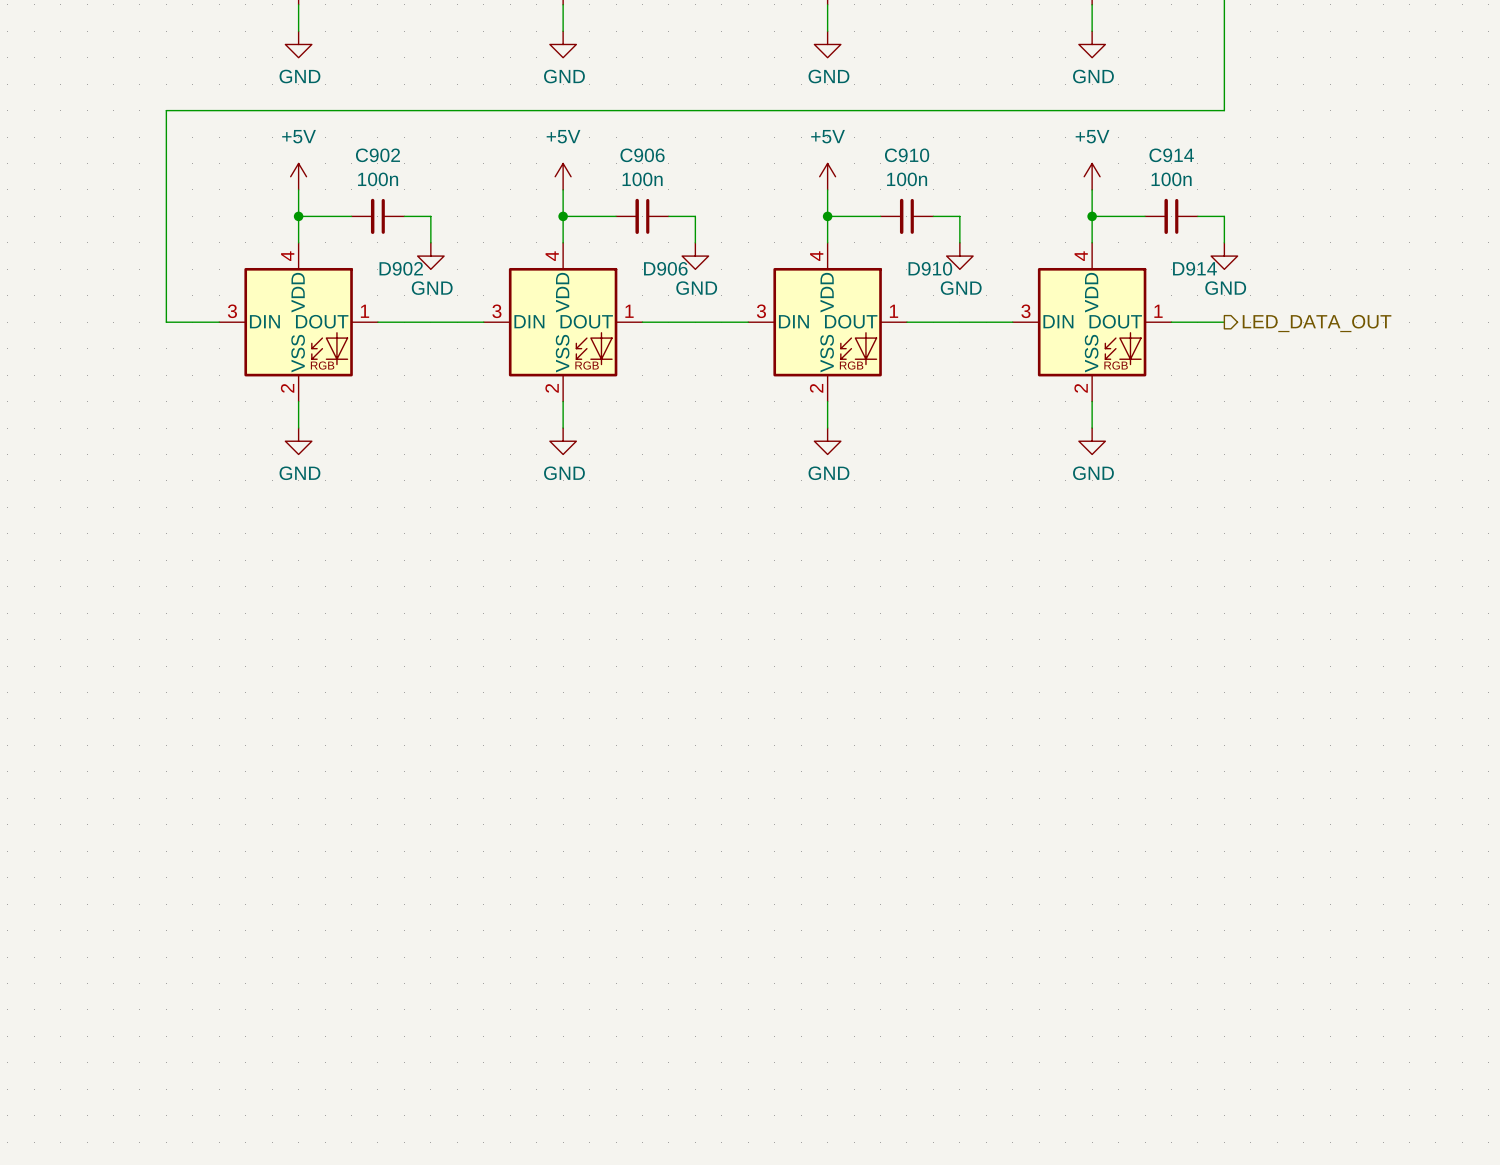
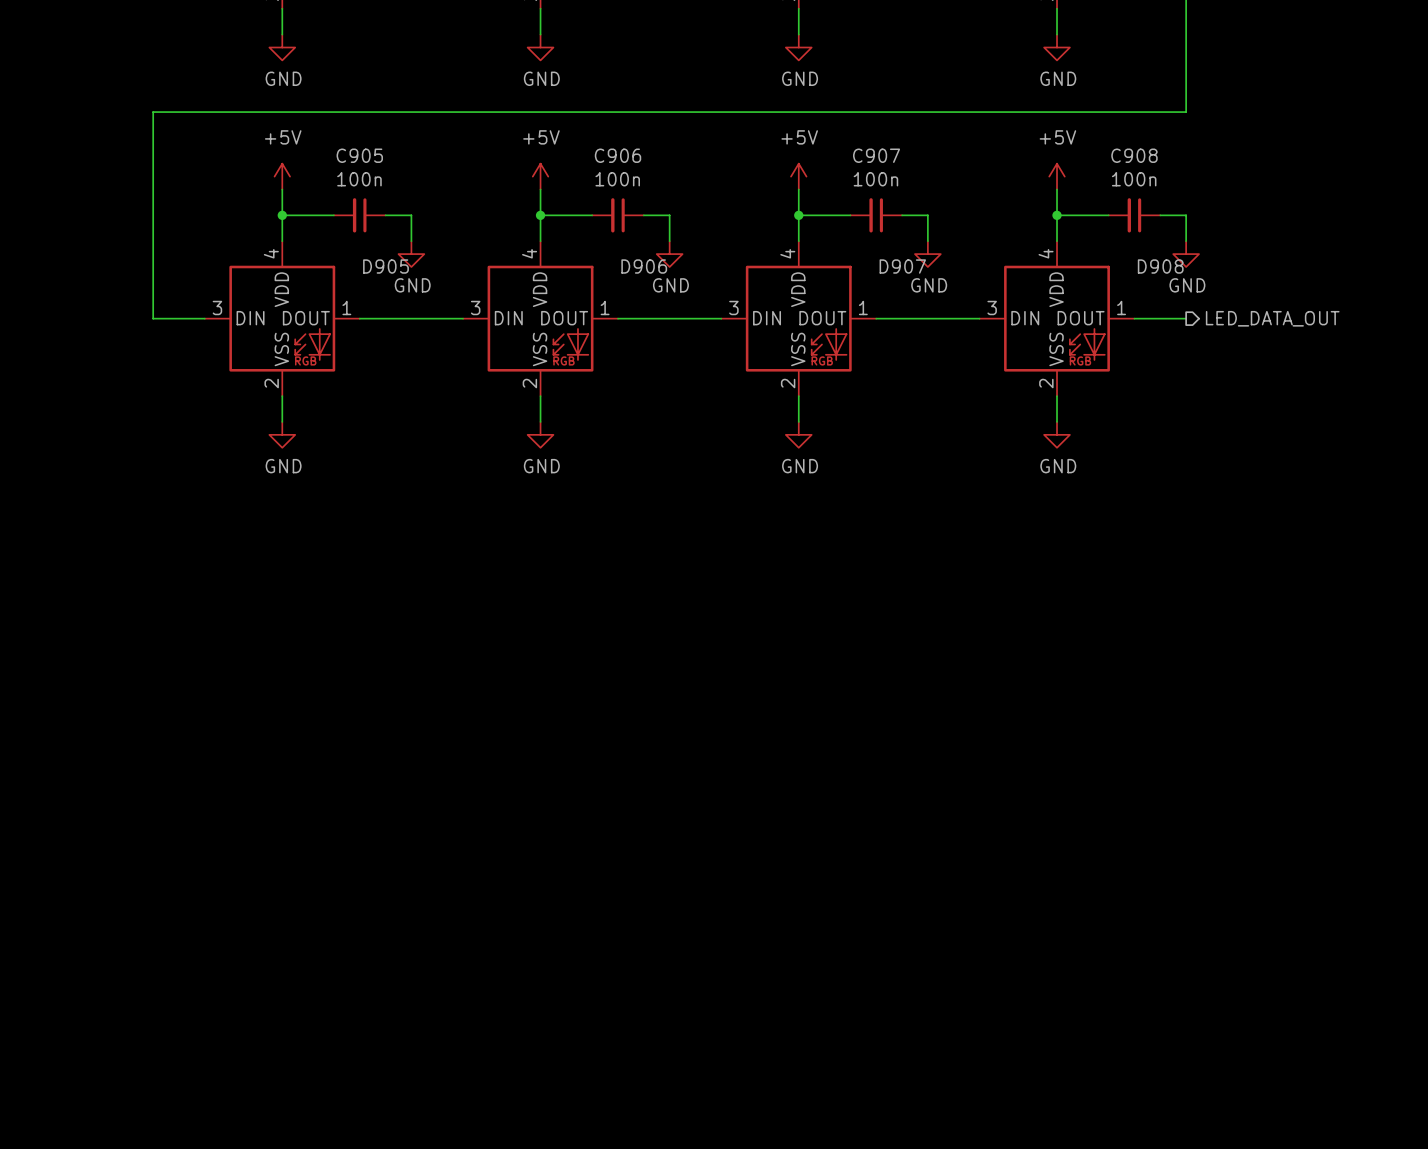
C902 name: C902 (377, 155) -> C905 (359, 155)
C910 name: C910 (907, 155) -> C907 (876, 155)
C914 name: C914 (1171, 155) -> C908 (1134, 155)
D902 name: D902 (401, 268) -> D905 (385, 266)
D910 name: D910 (930, 268) -> D907 (902, 266)
D914 name: D914 (1194, 268) -> D908 (1160, 266)

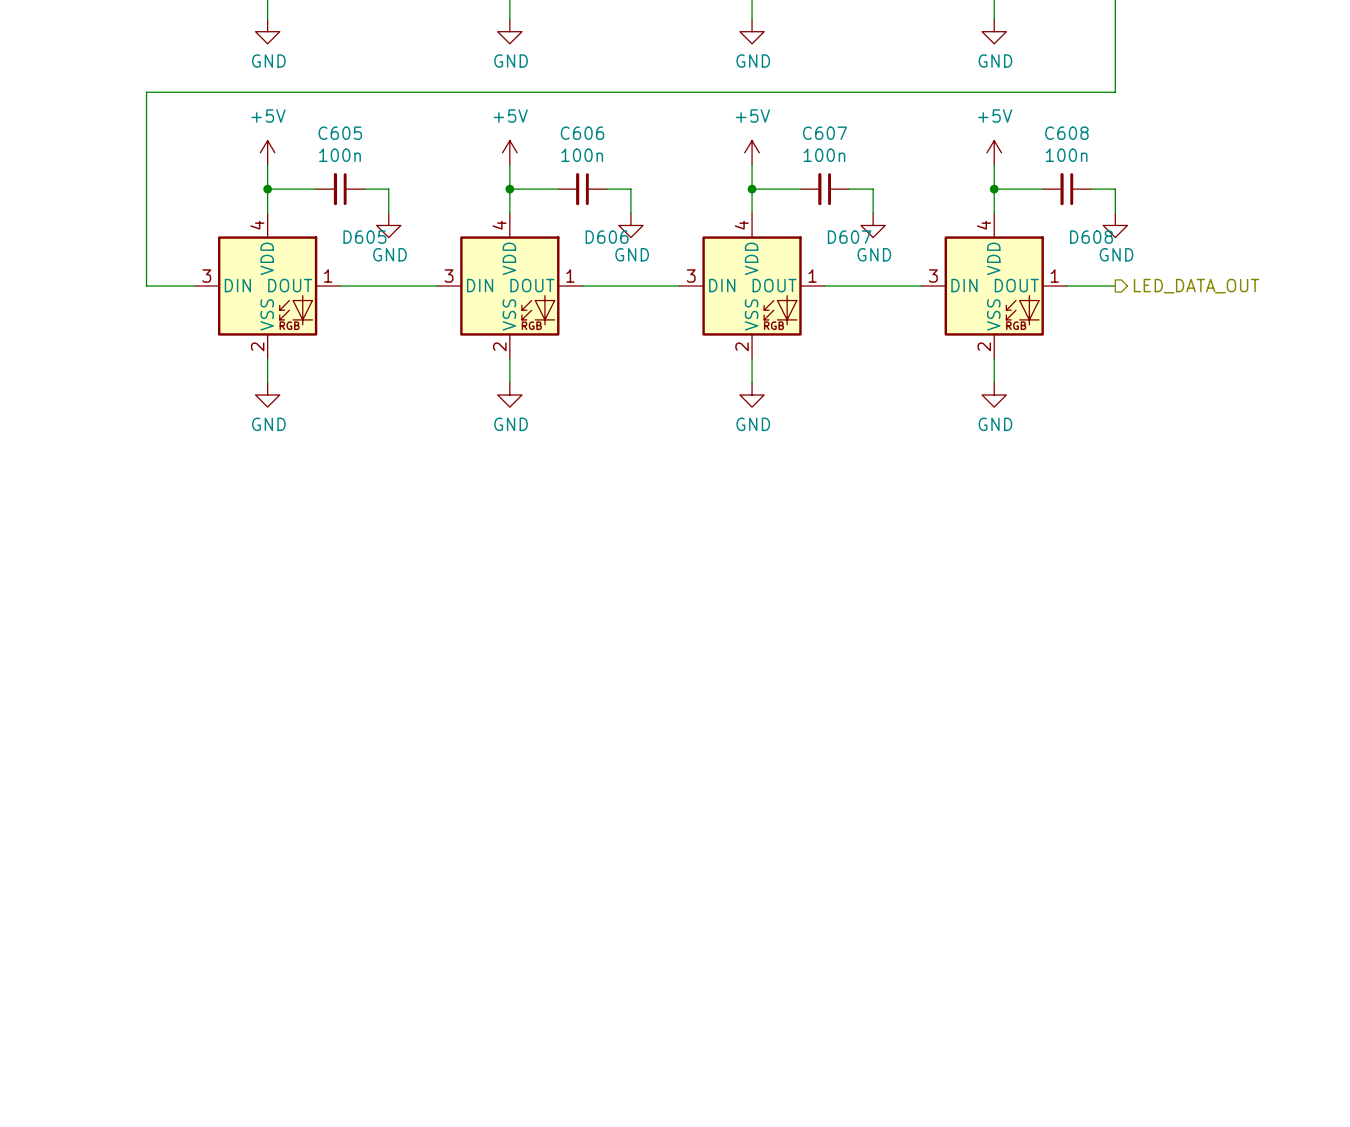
C905 name: C905 (359, 155) -> C605 (340, 133)
C906 name: C906 (618, 155) -> C606 (582, 133)
C907 name: C907 (876, 155) -> C607 (824, 133)
C908 name: C908 (1134, 155) -> C608 (1066, 133)
D905 name: D905 (385, 266) -> D605 (364, 237)
D906 name: D906 (644, 266) -> D606 (607, 237)
D907 name: D907 (902, 266) -> D607 (849, 237)
D908 name: D908 (1160, 266) -> D608 (1091, 237)

